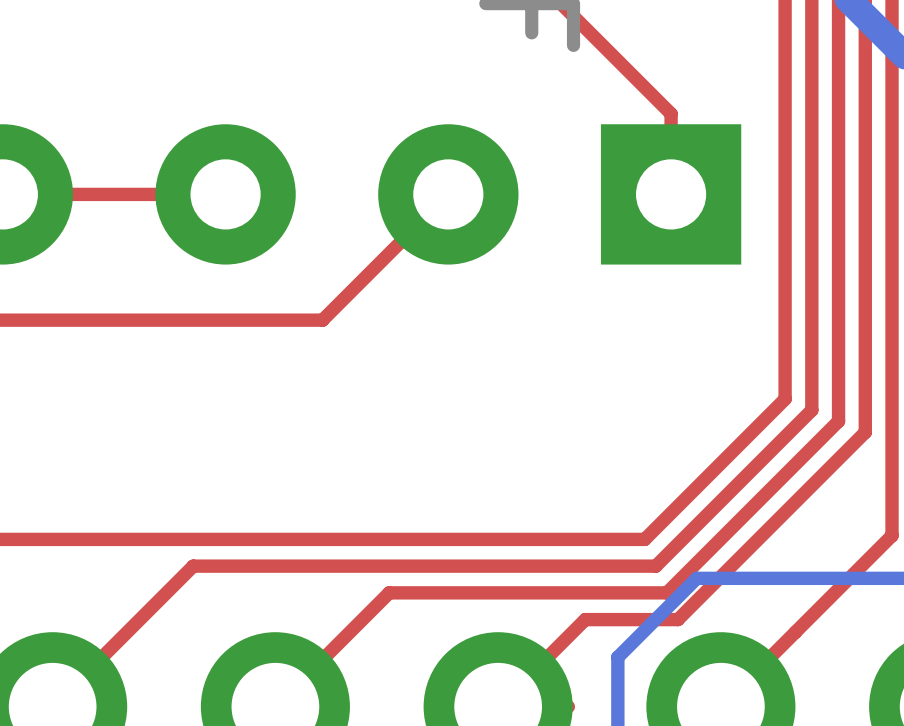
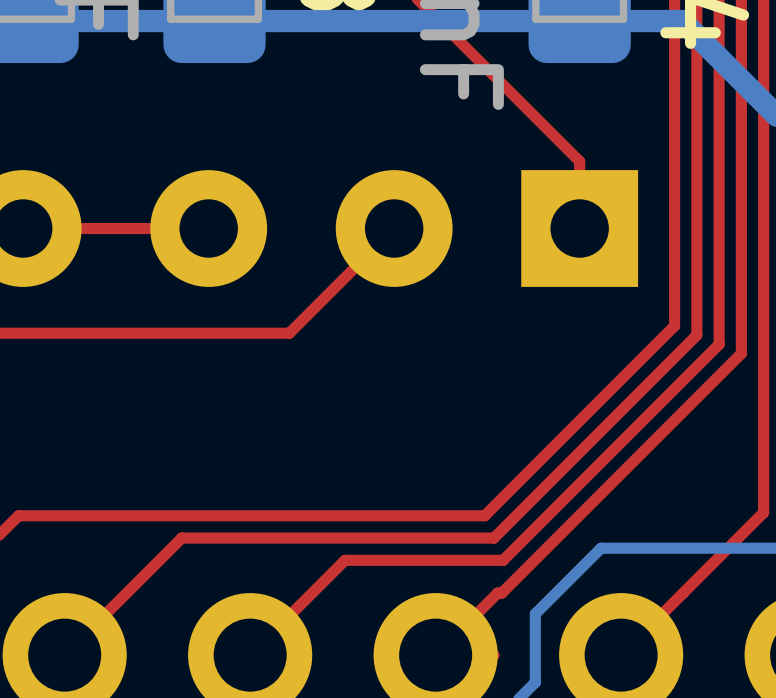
top track: (785, 311) (785, 399) (644, 539) (557, 539) -> (674, 325) (484, 515)
top track: (811, 322) (811, 410) (655, 566) (568, 566) -> (696, 335) (493, 538)
top track: (838, 333) (838, 421) (666, 592) (579, 592) -> (719, 344) (503, 560)
top track: (865, 344) (865, 432) (677, 619) (585, 619) (572, 632) -> (741, 353) (501, 593) (497, 593)

